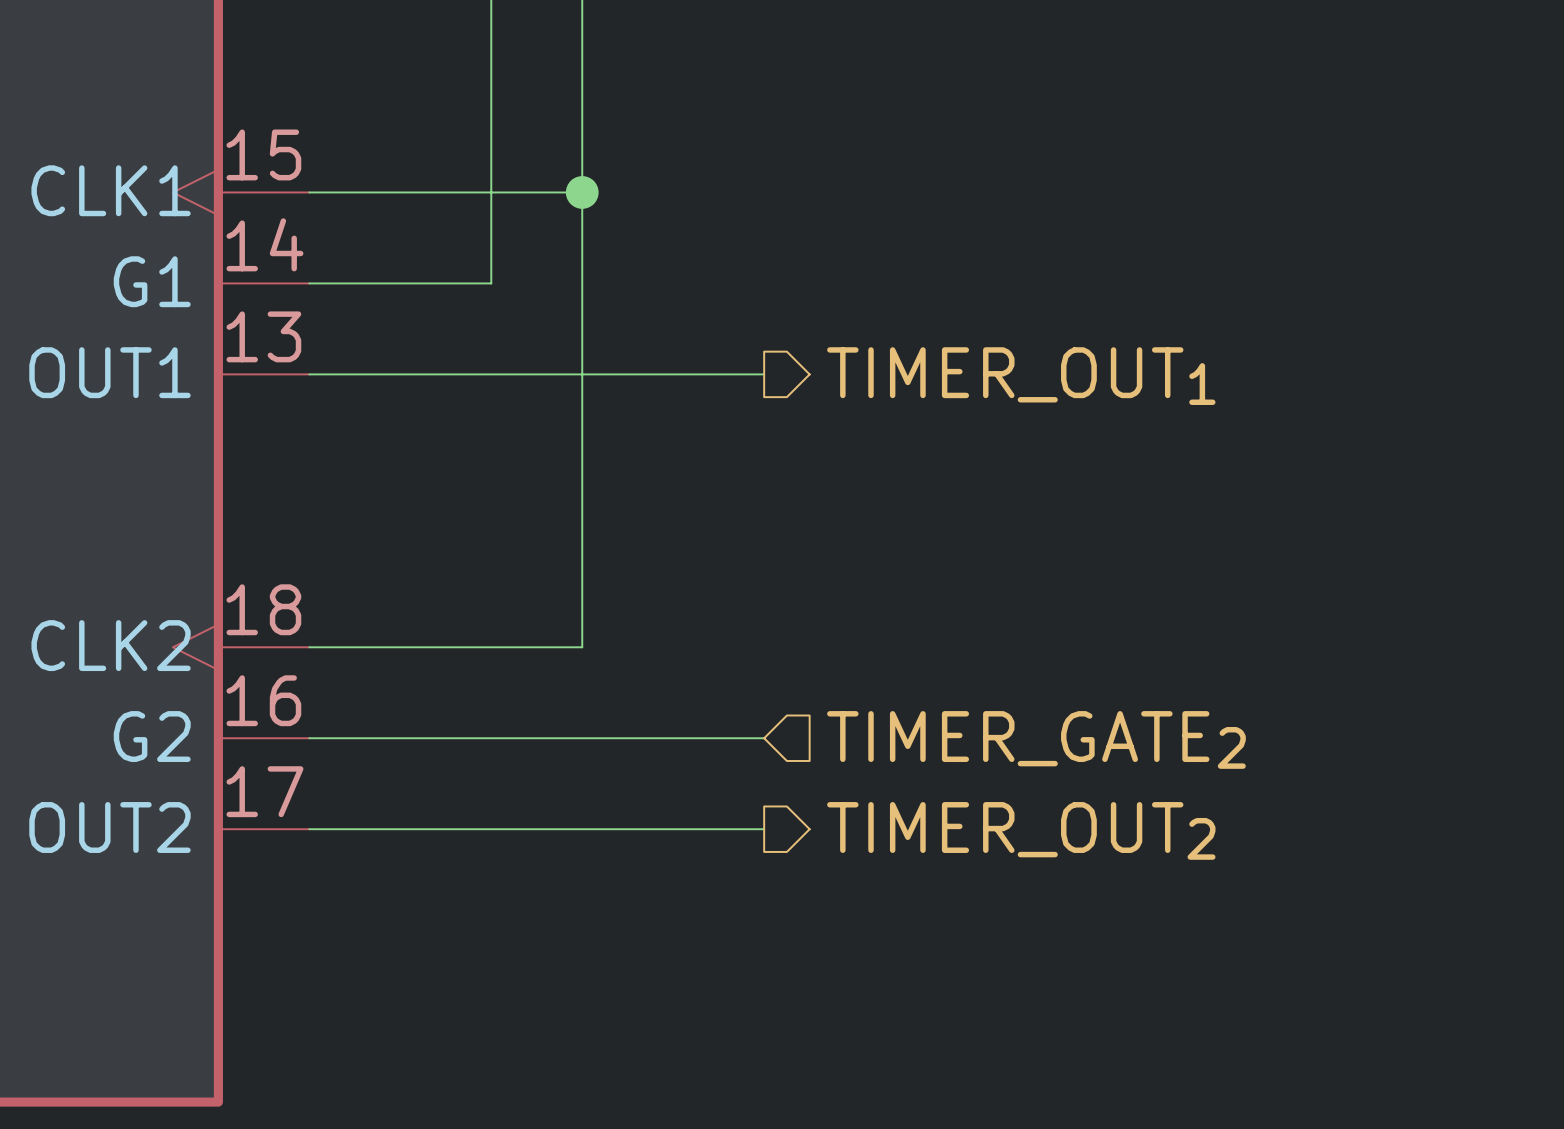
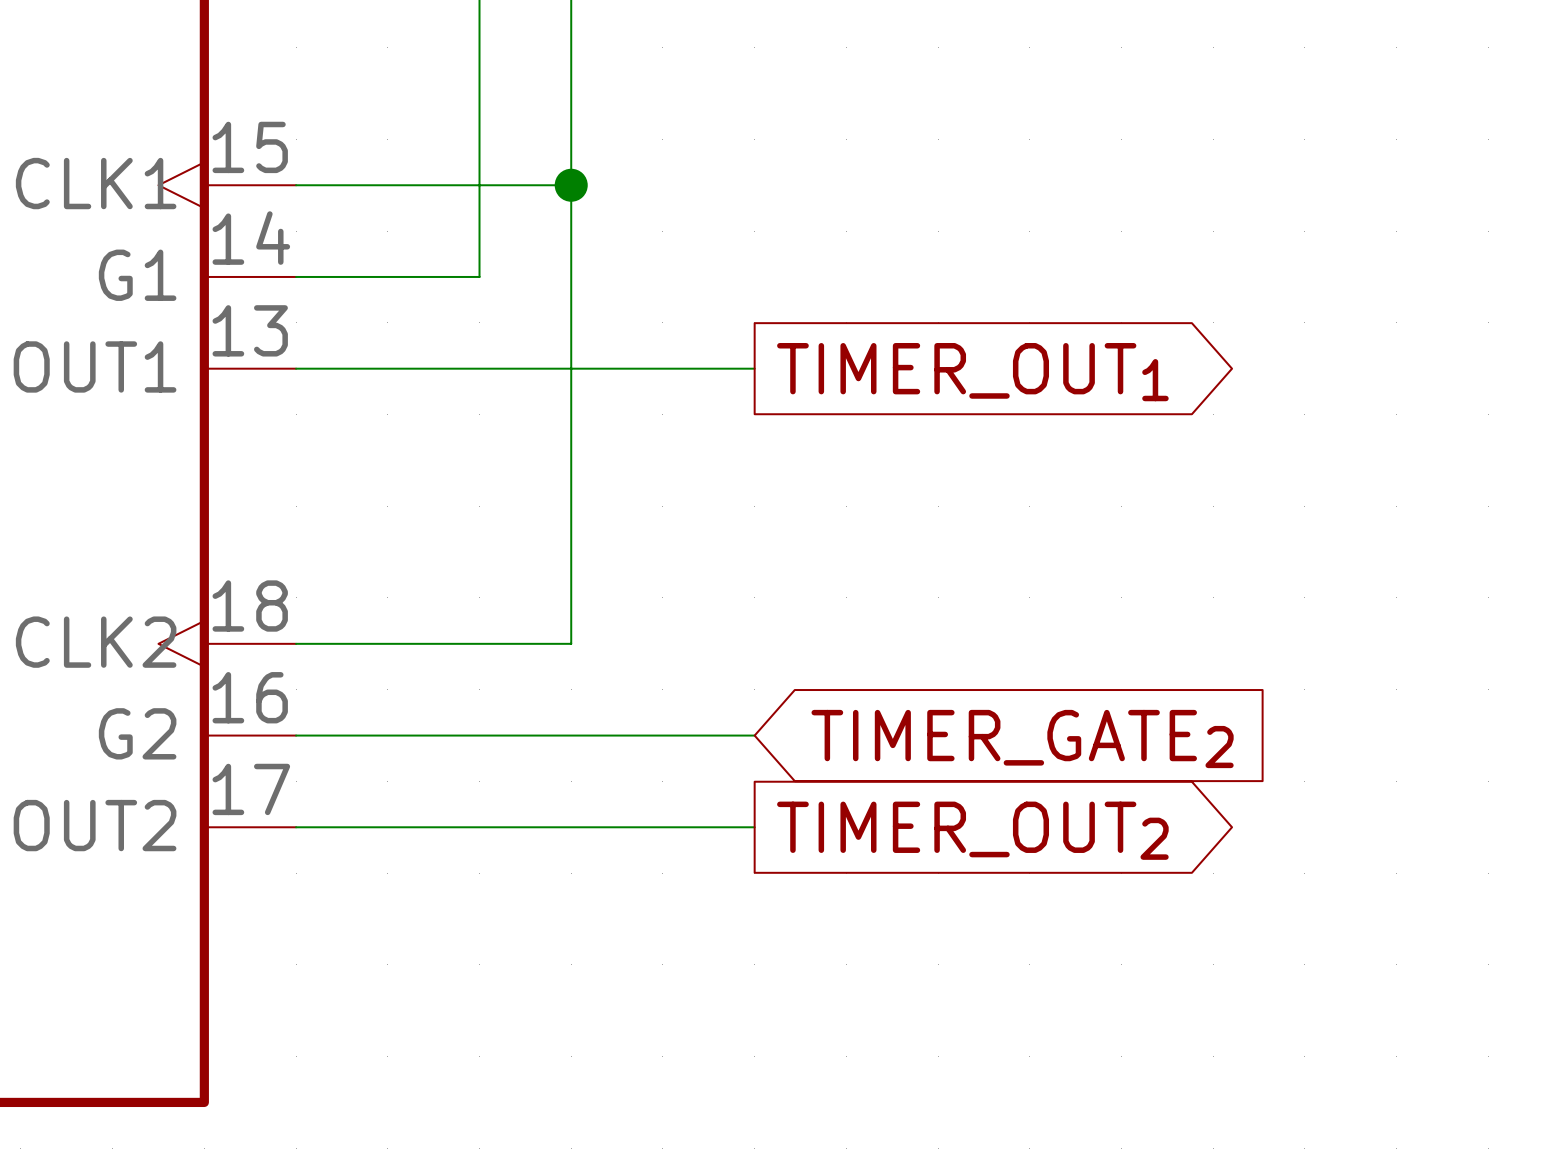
hierarchical label: TIMER_OUT1 (1021, 376) -> none
global label: none -> TIMER_OUT1 (972, 372)
hierarchical label: TIMER_GATE2 (1036, 739) -> none
global label: none -> TIMER_GATE2 (1022, 739)
hierarchical label: TIMER_OUT2 (1021, 830) -> none
global label: none -> TIMER_OUT2 (972, 830)

